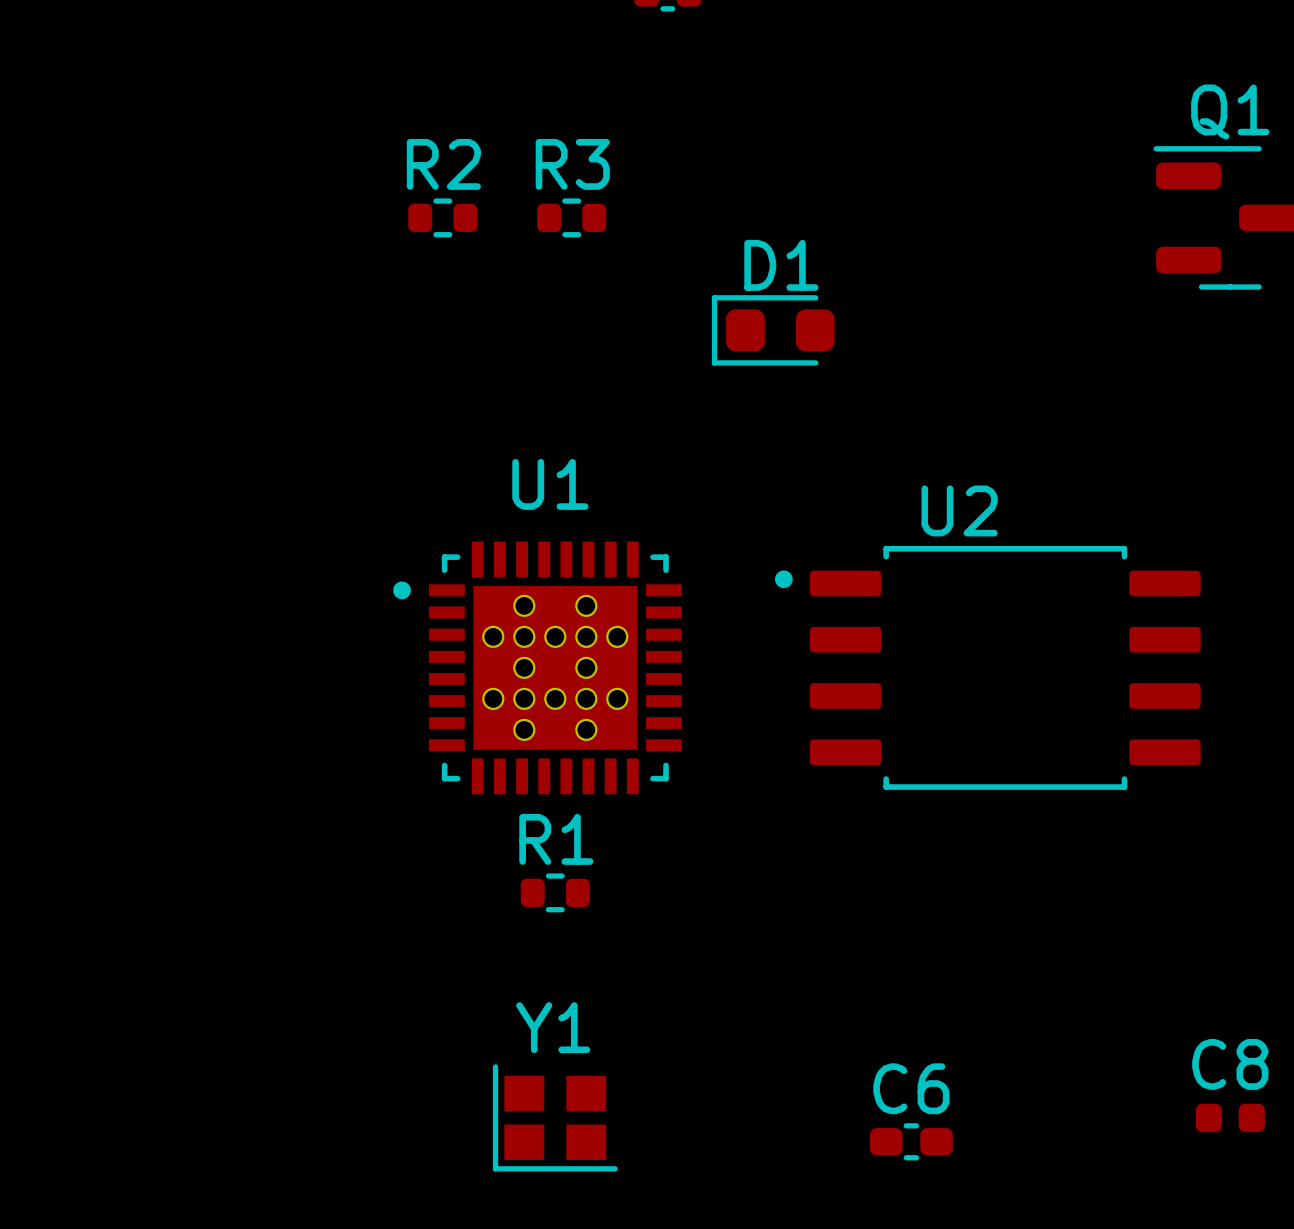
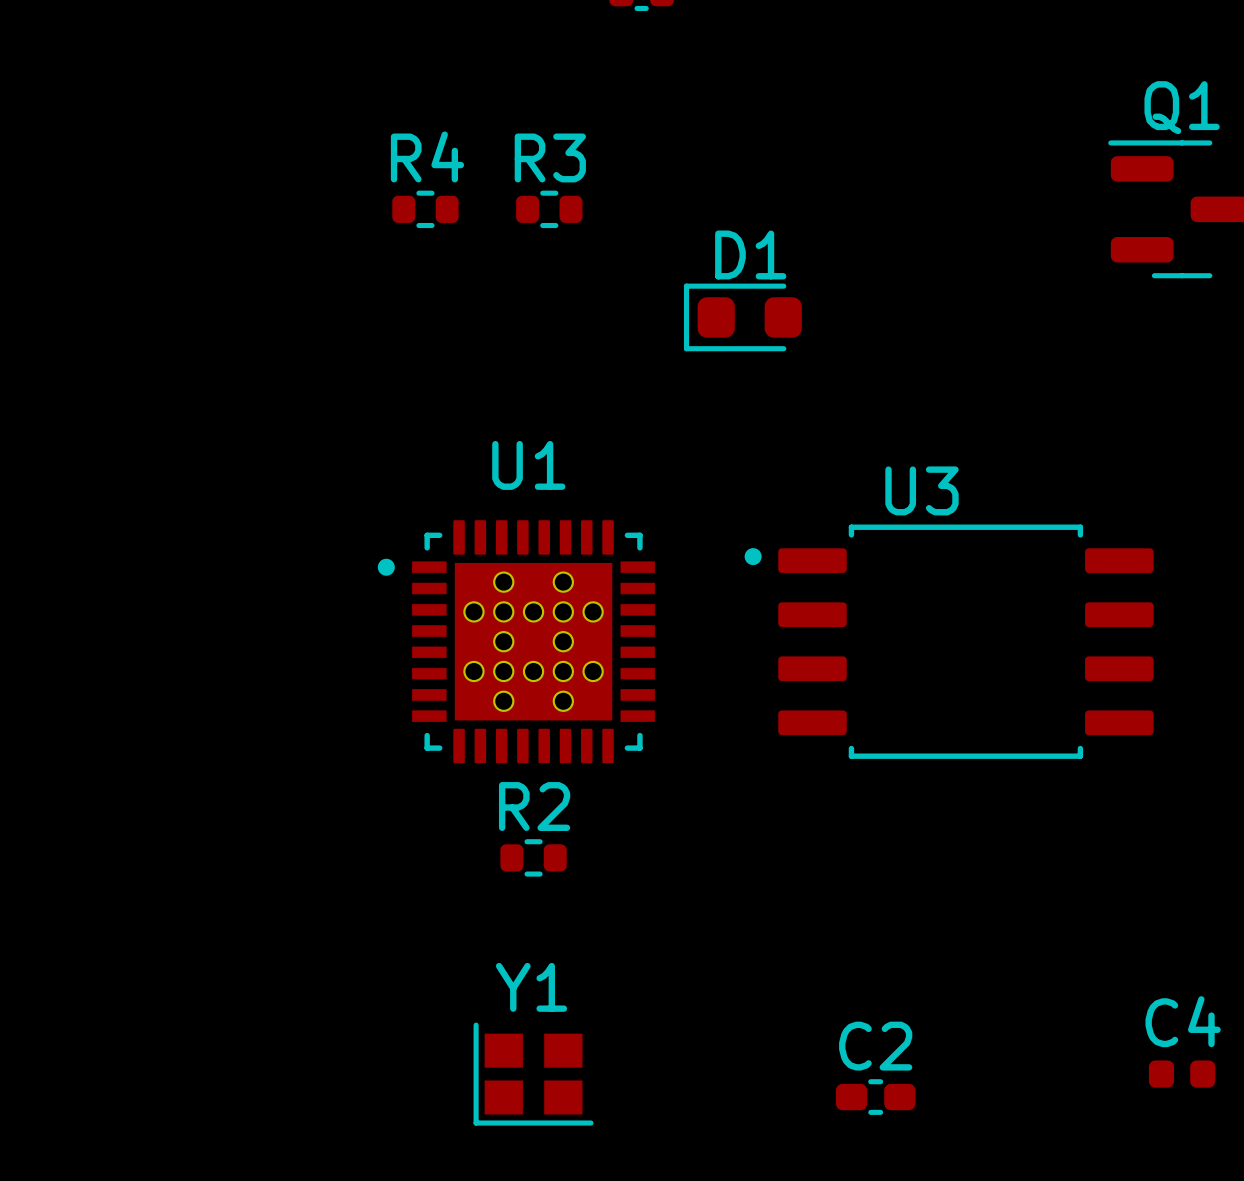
R2 name: R2 (443, 164) -> R4 (427, 156)
U2 name: U2 (959, 510) -> U3 (921, 490)
R1 name: R1 (556, 839) -> R2 (534, 806)
C8 name: C8 (1230, 1064) -> C4 (1183, 1021)
C6 name: C6 (911, 1088) -> C2 (875, 1046)

